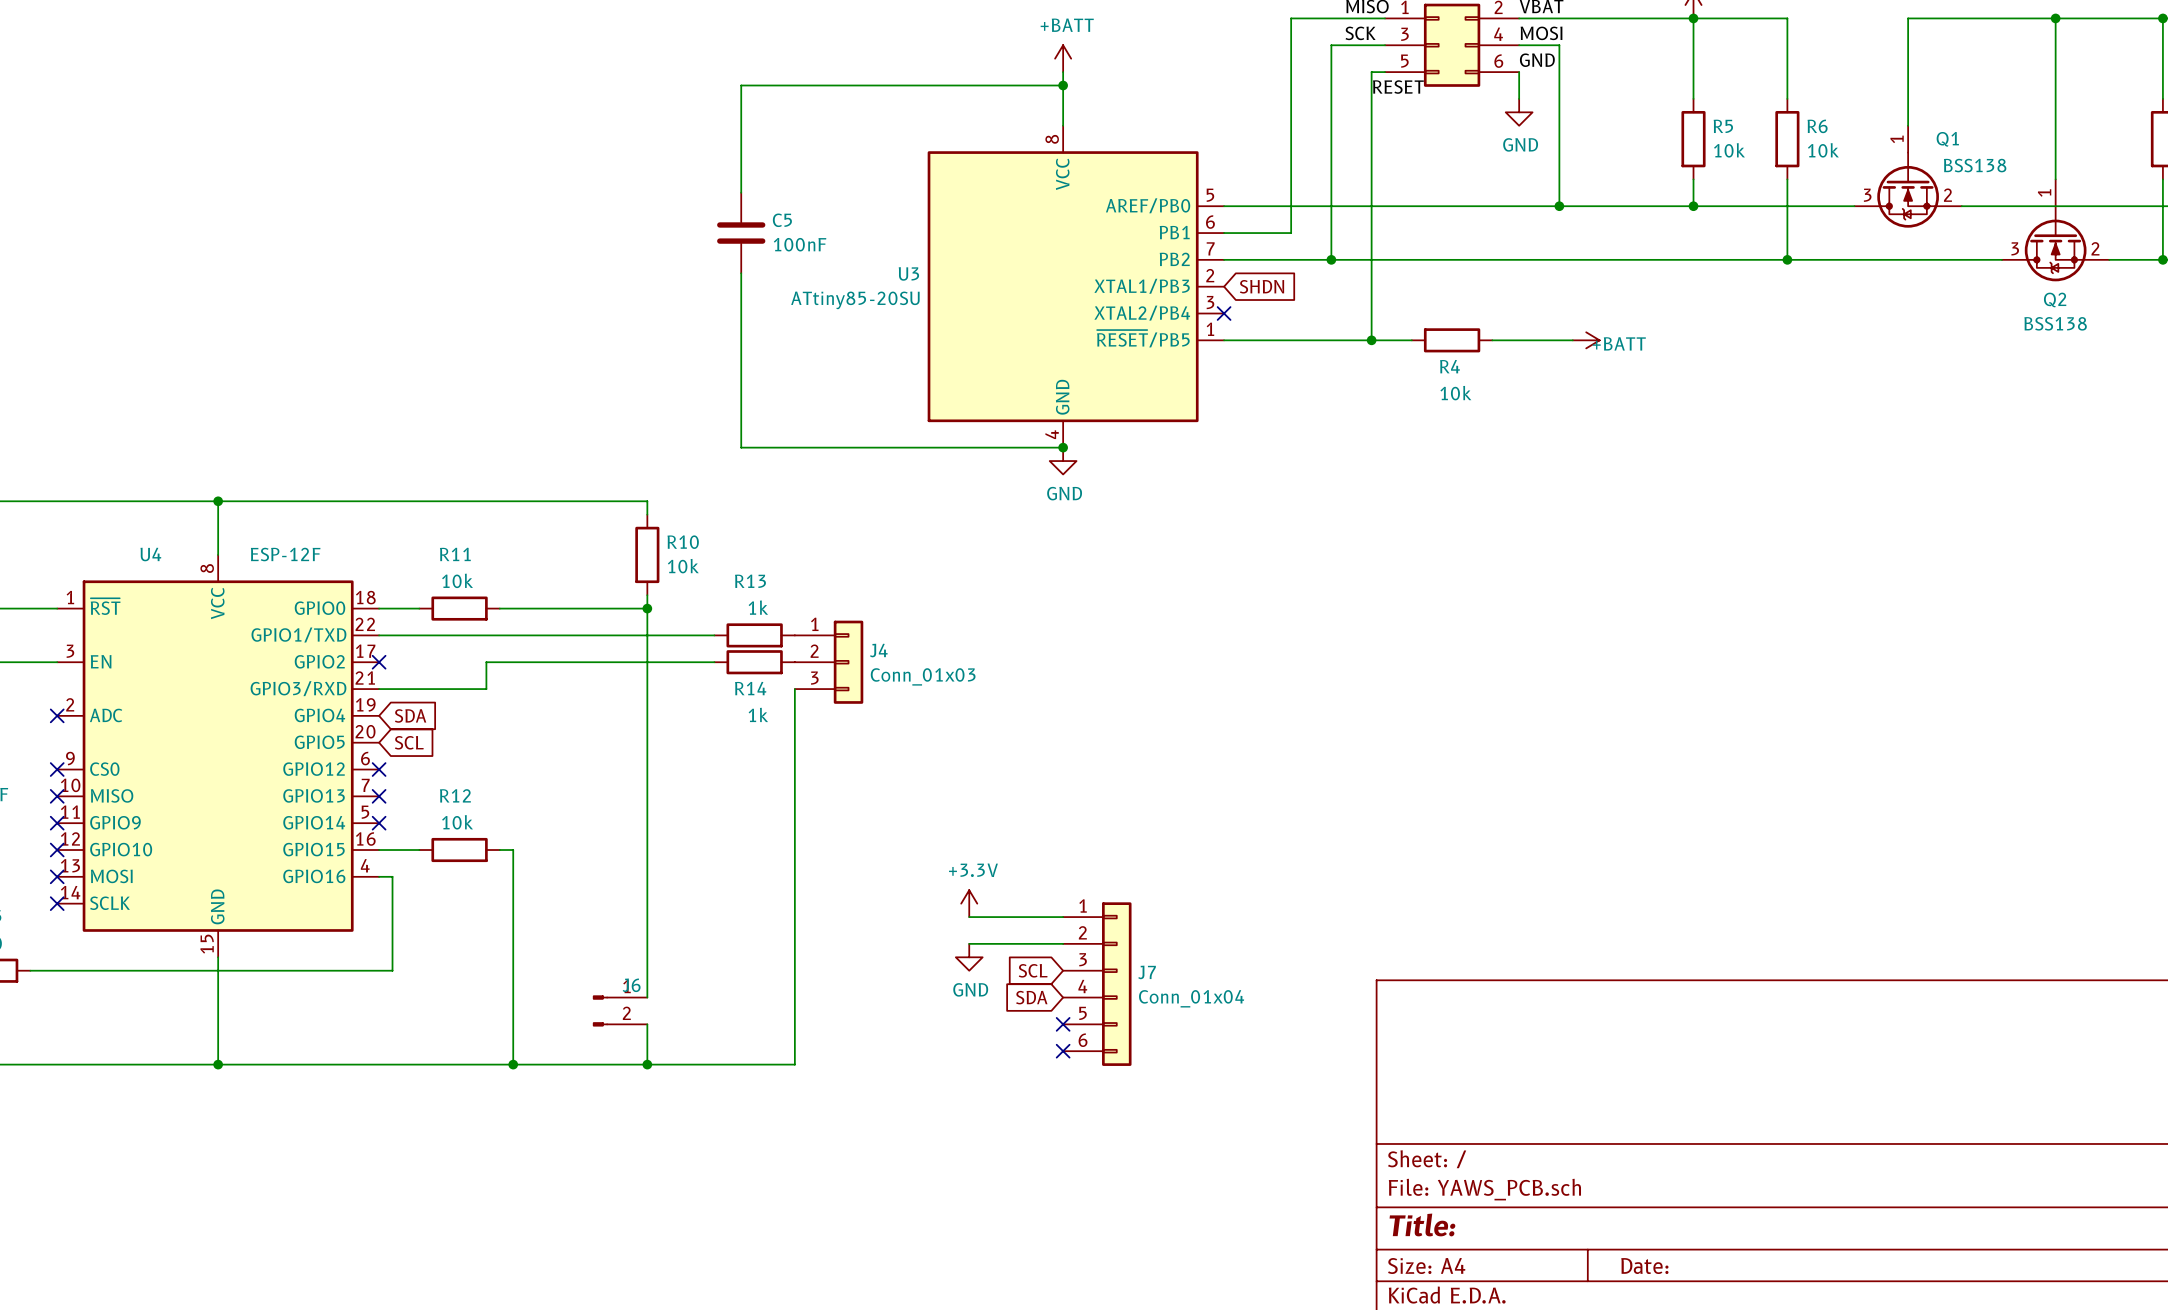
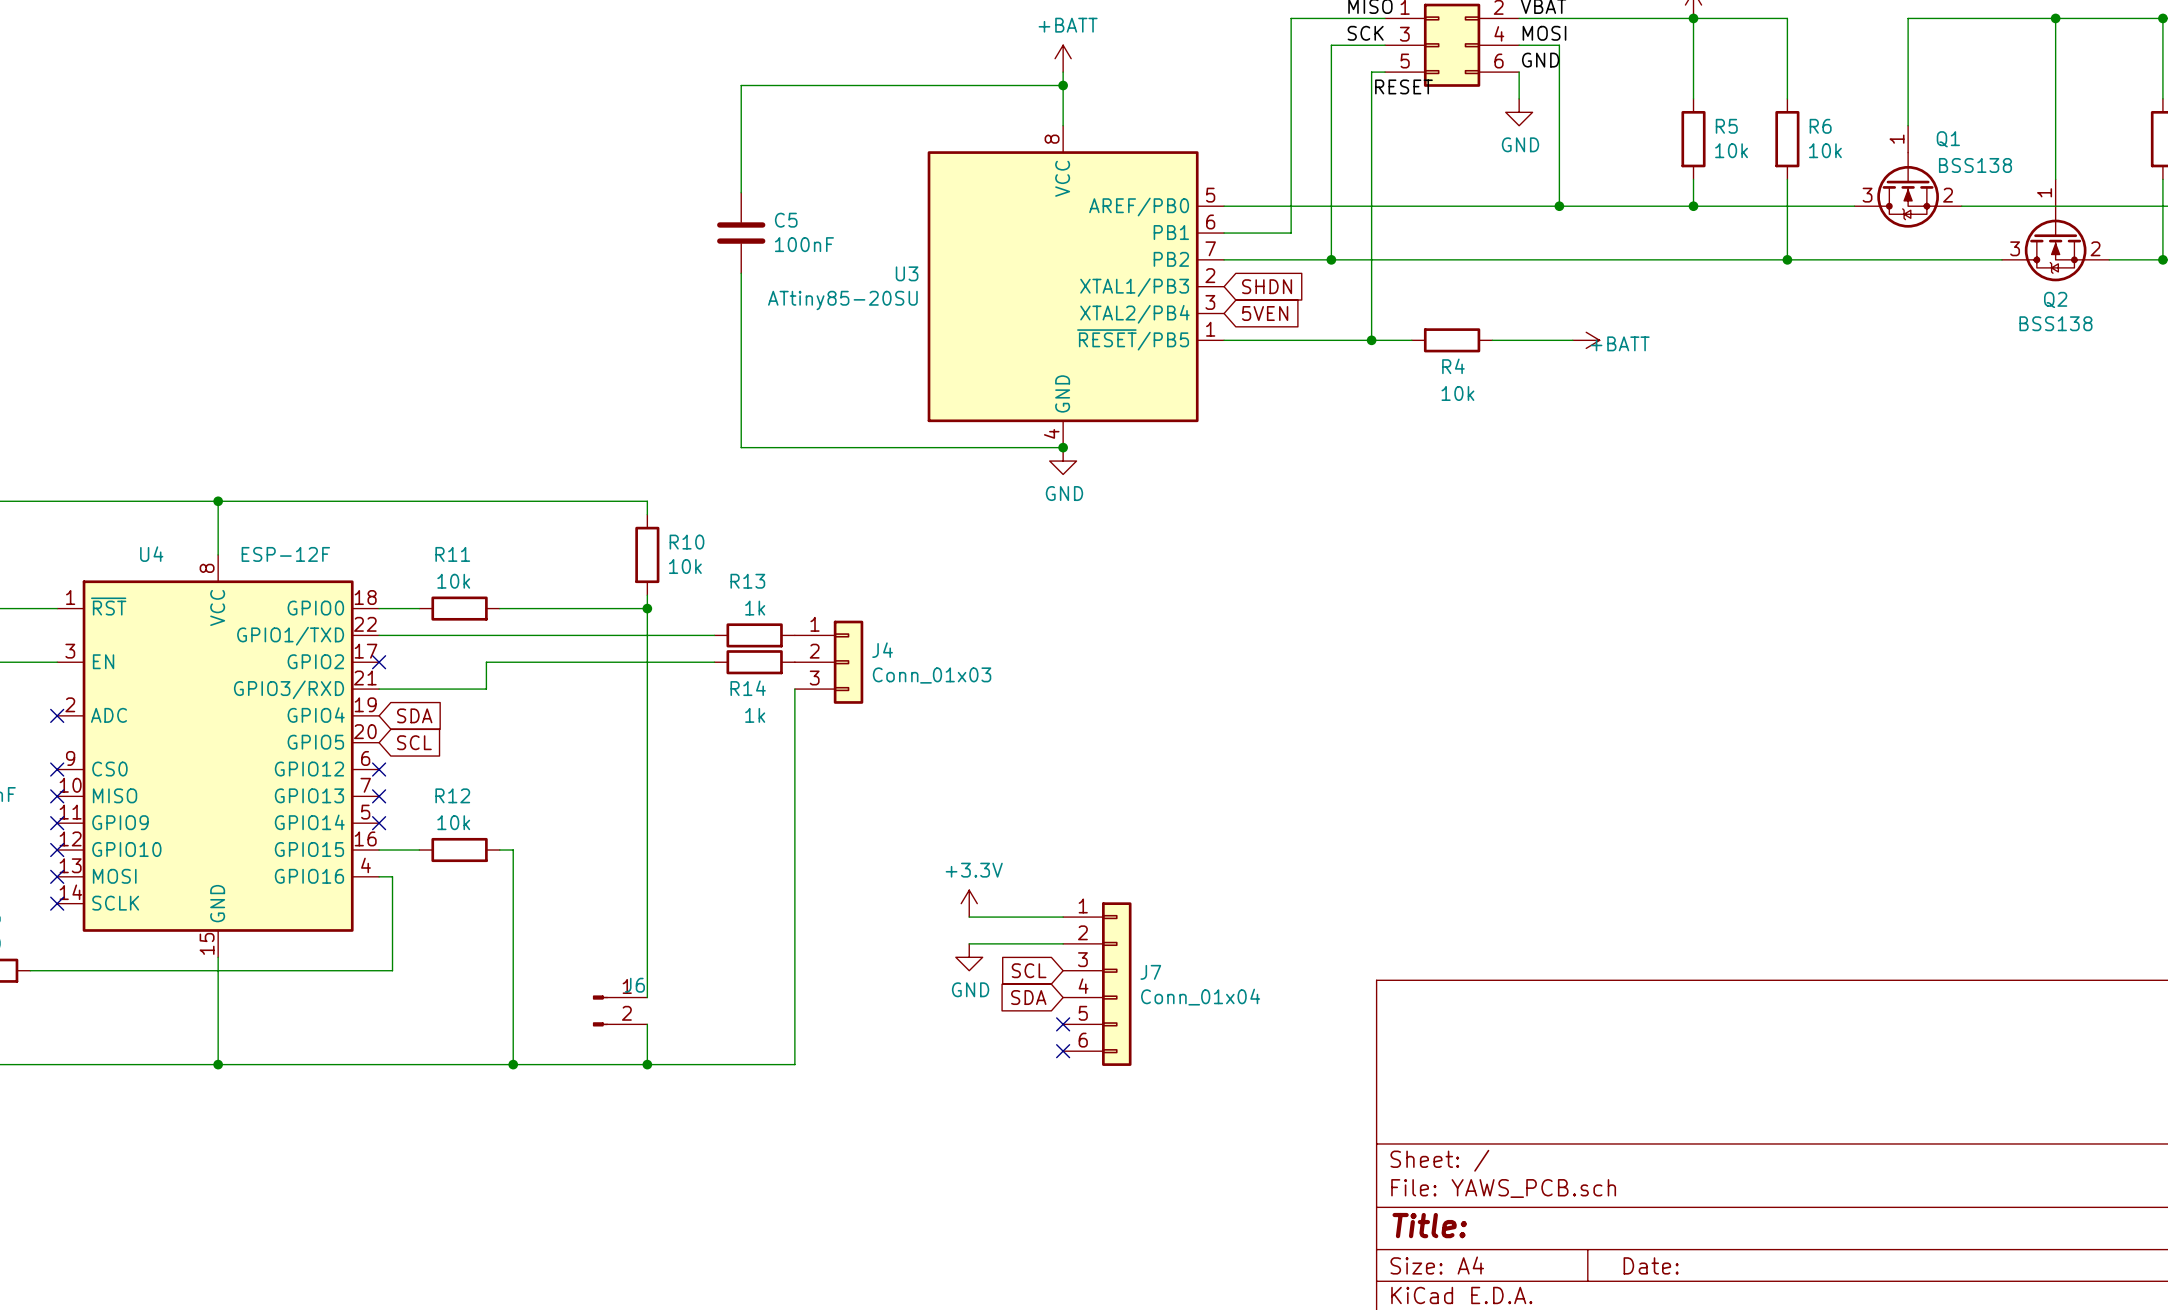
no-connect mark: (1224, 313) -> none
global label: none -> 5VEN (1265, 313)

